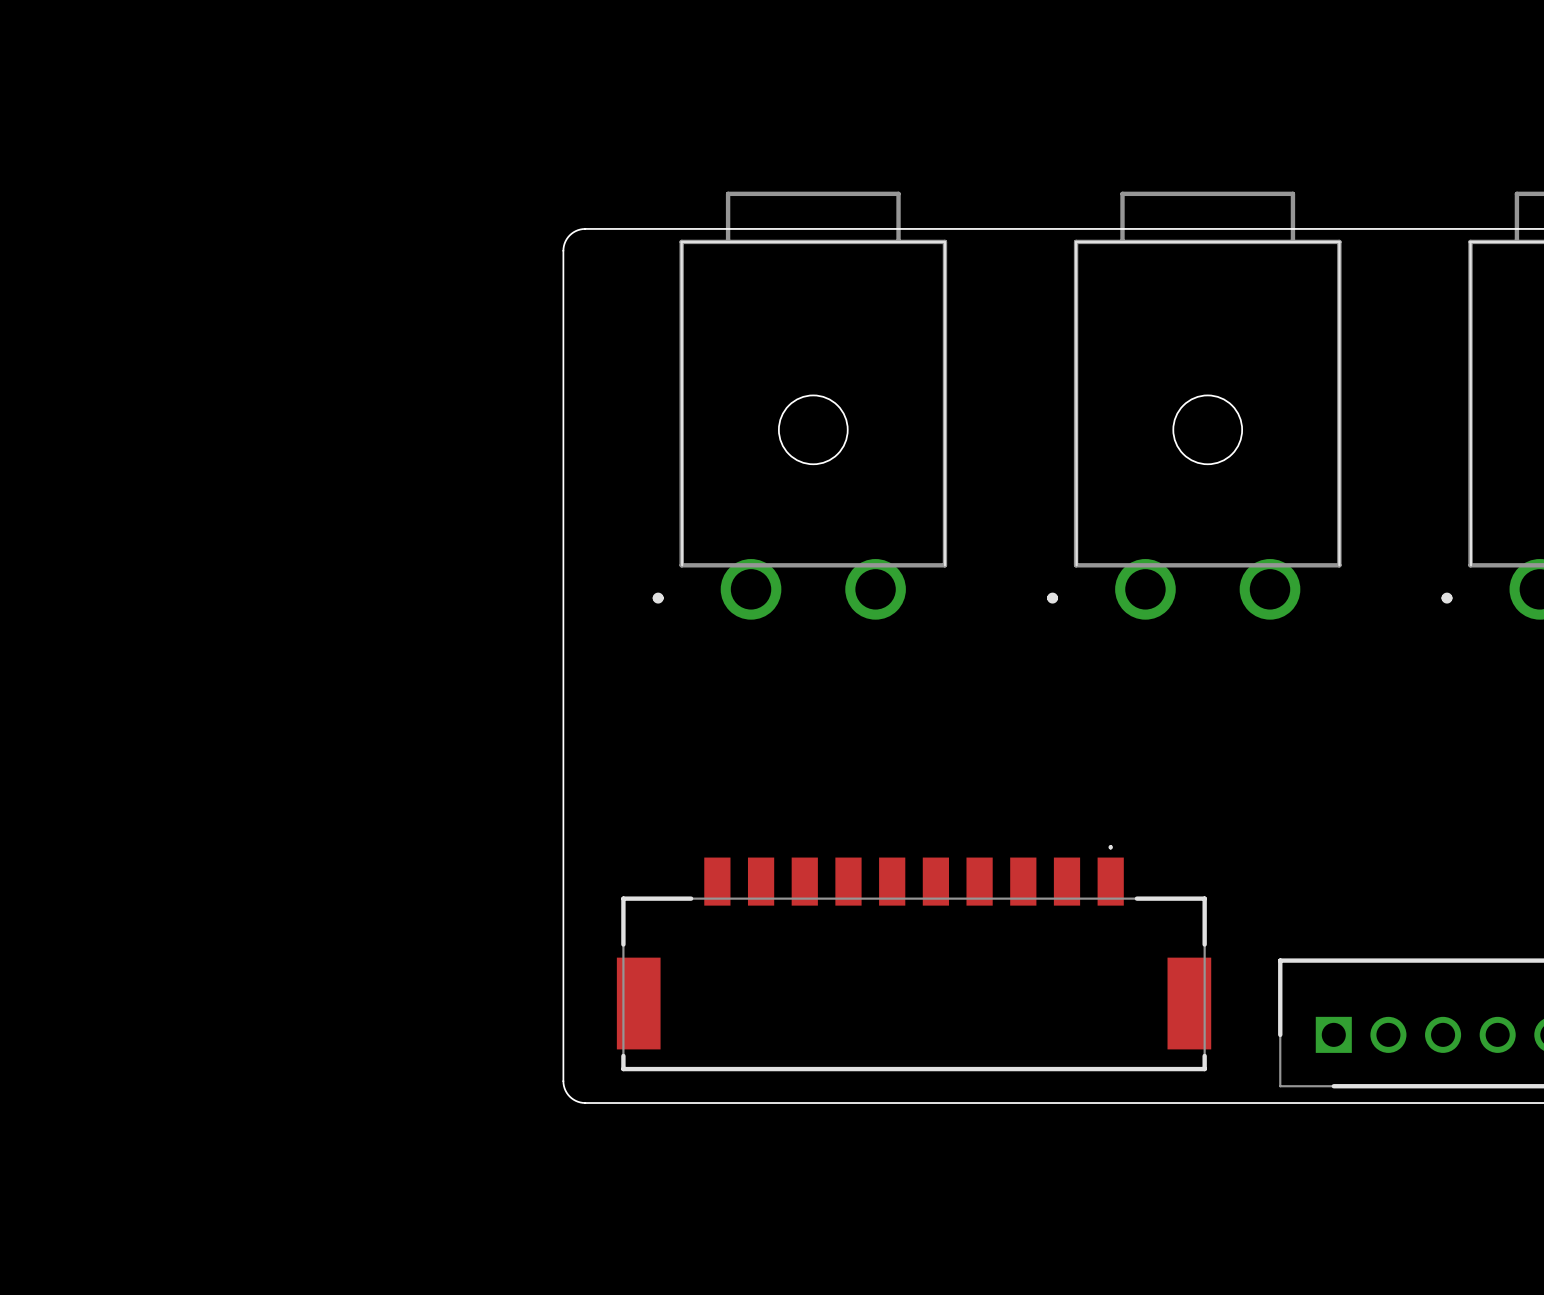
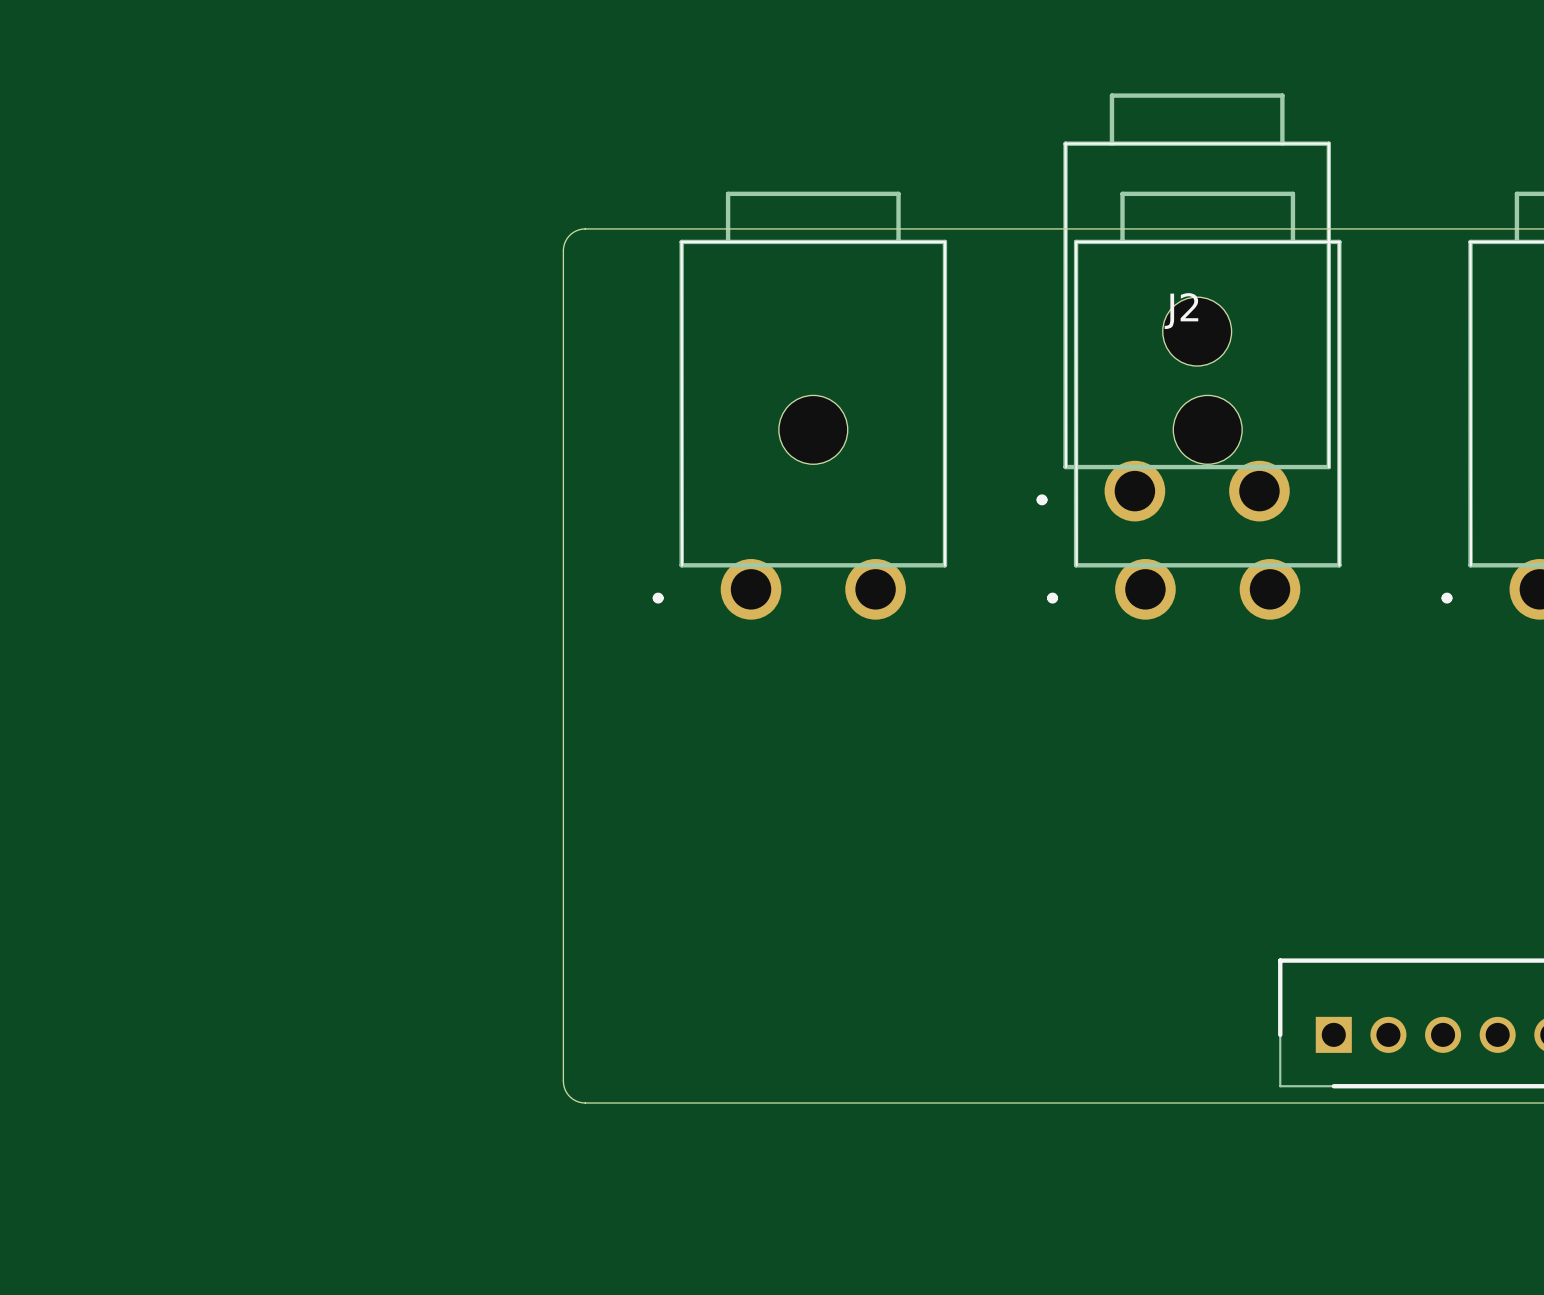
J2: none -> (1183, 307)
part: (914, 958) -> none

